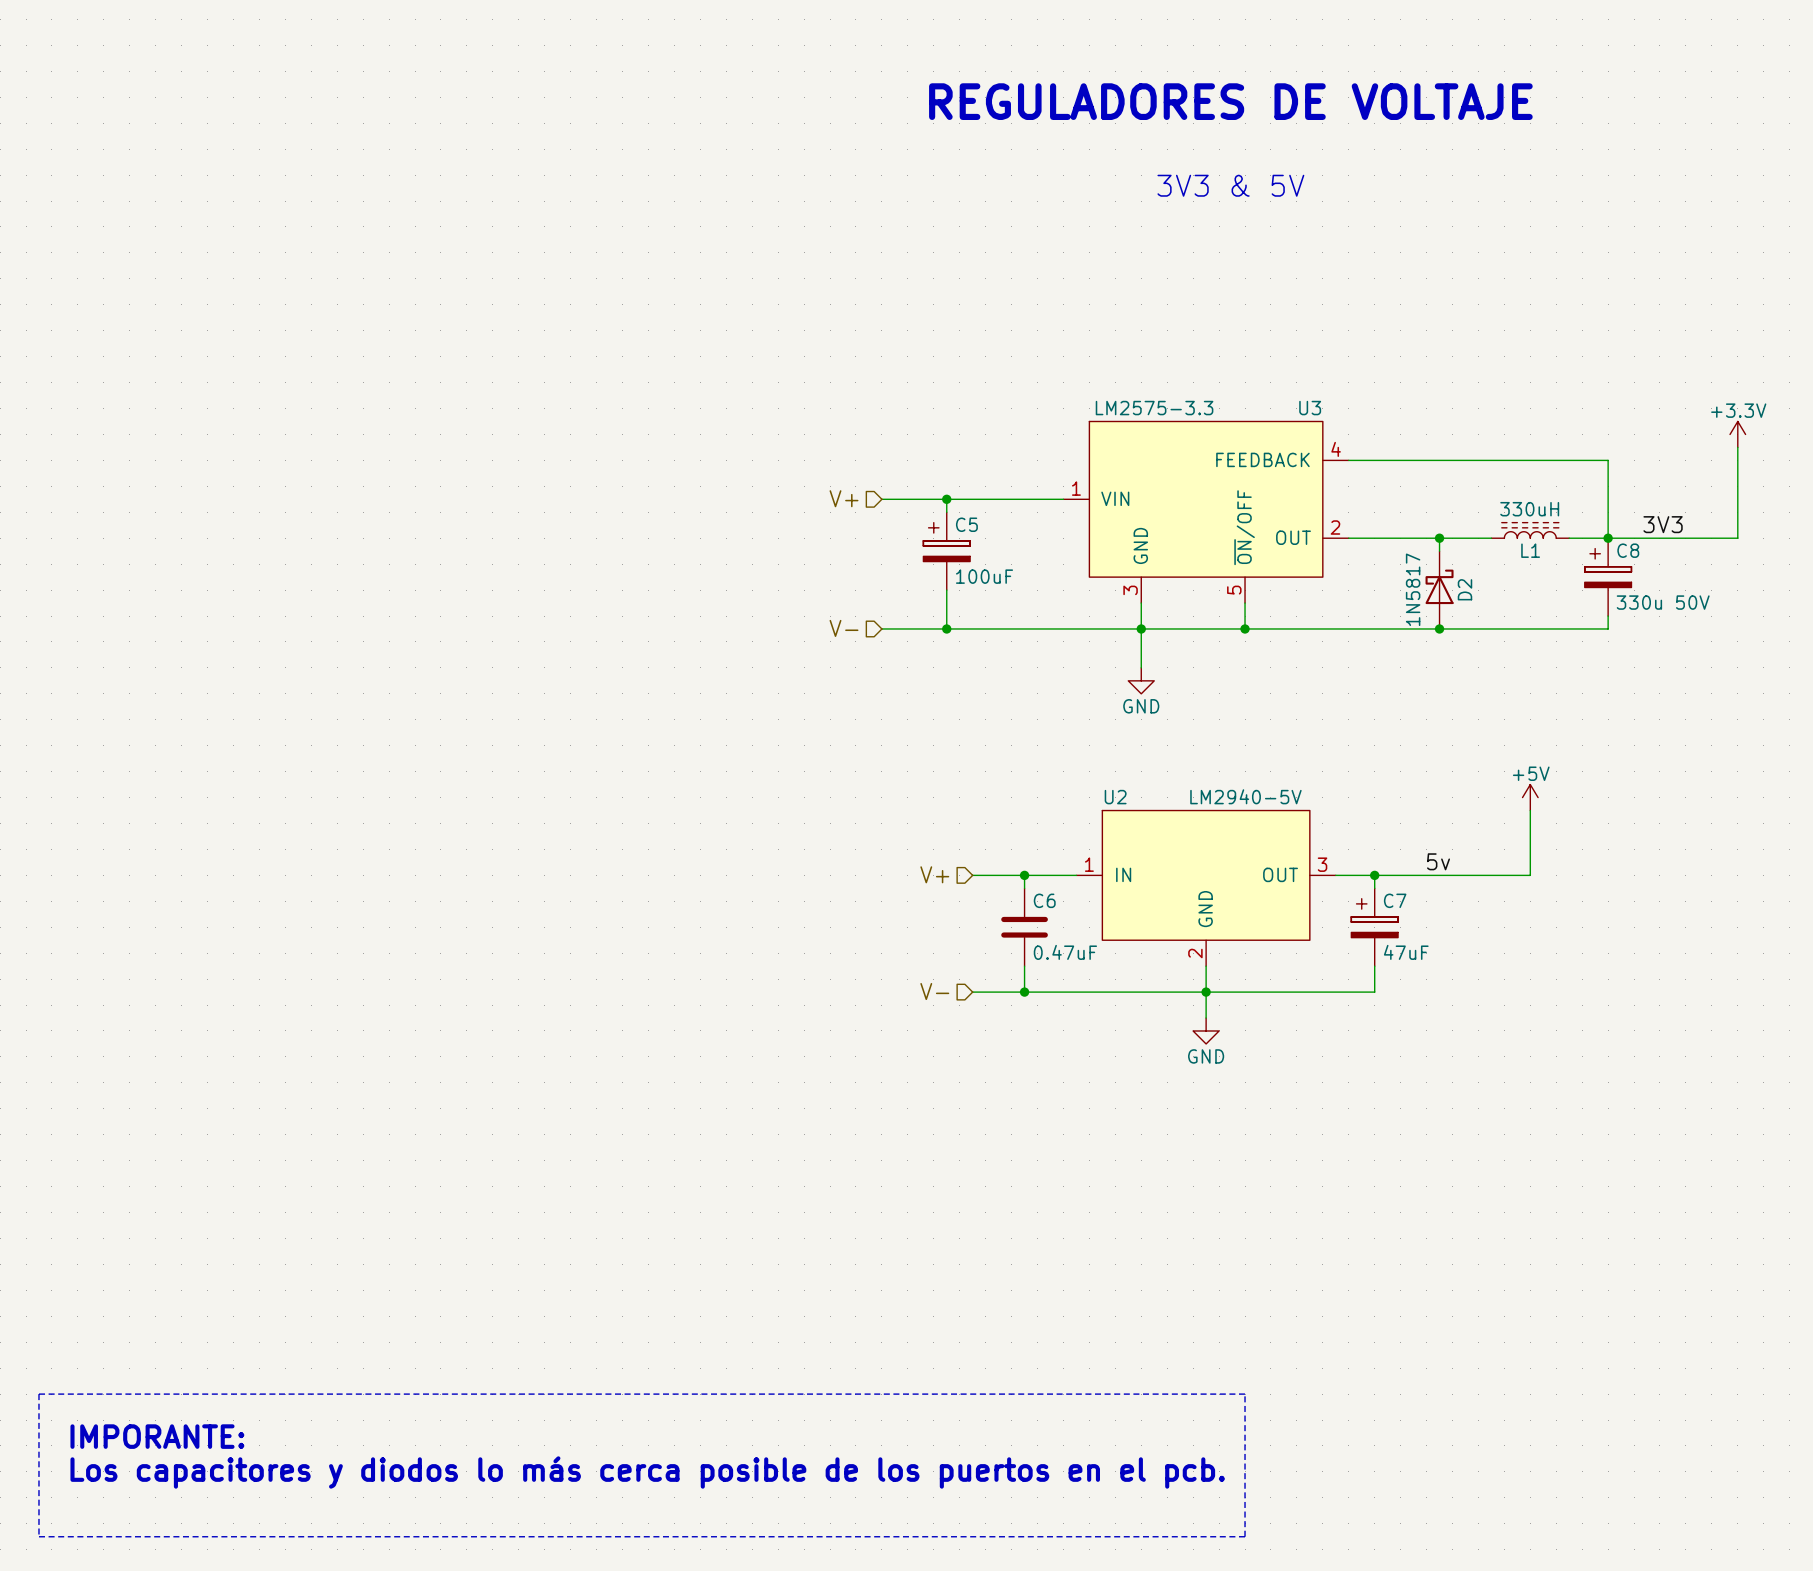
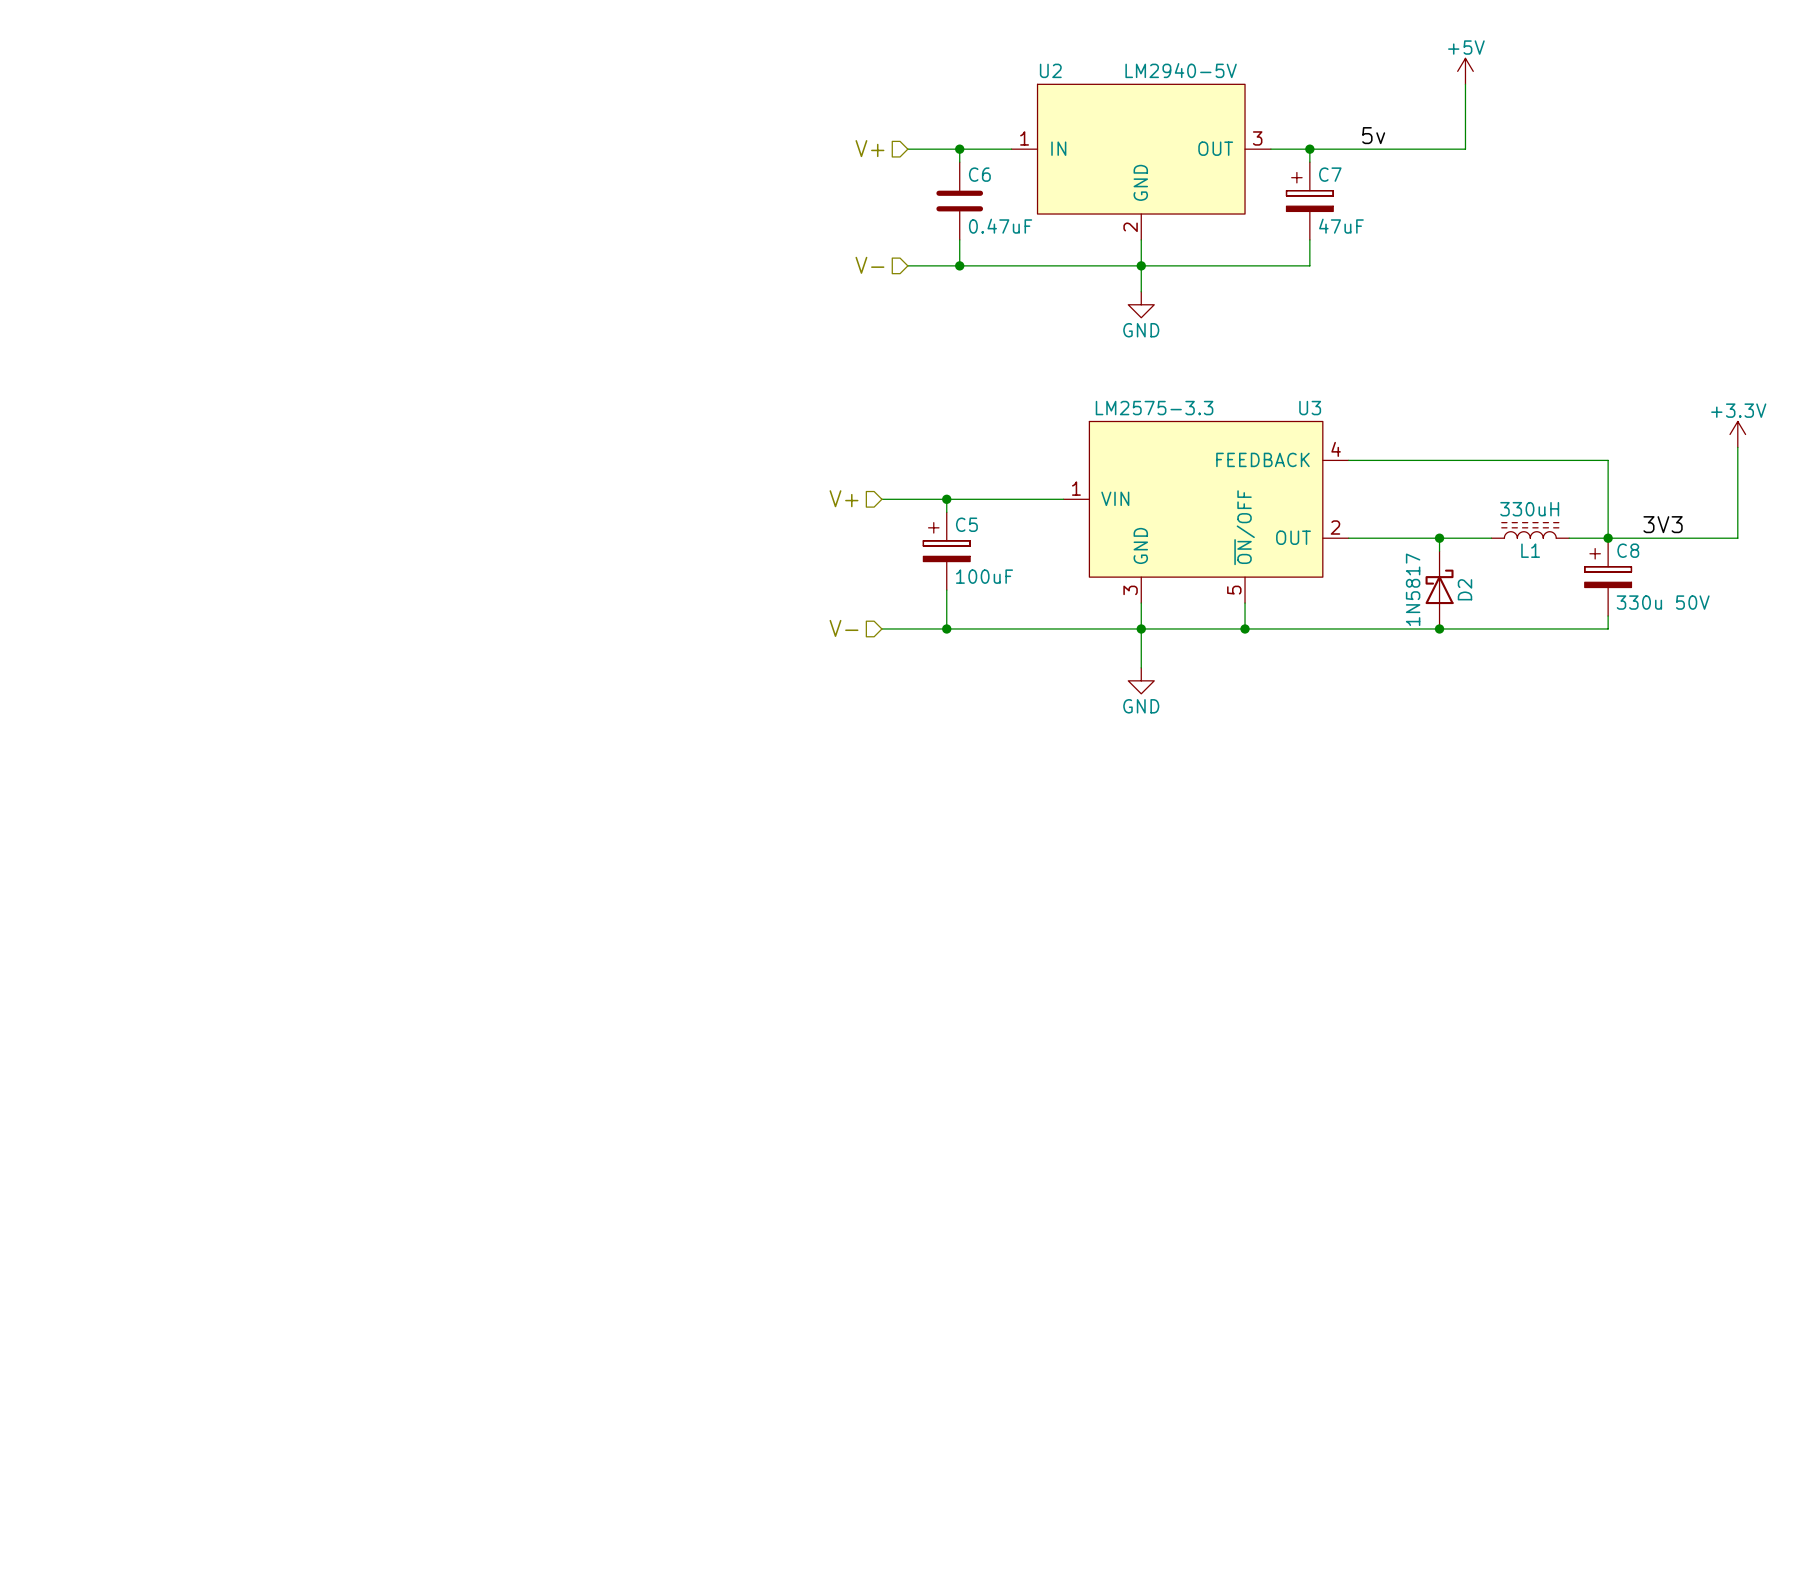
power symbol: none -> +5V (1465, 71)
wire: none -> (1465, 84) (1465, 149) (1270, 149)
text: REGULADORES DE VOLTAJE (1230, 101) -> none
label: none -> 5v (1373, 135)
hierarchical label: none -> V+ (869, 148)
wire: none -> (907, 149) (1011, 149)
wire: none -> (959, 149) (959, 162)
junction: none -> (959, 149)
wire: none -> (1309, 149) (1309, 162)
junction: none -> (1309, 149)
text: 3V3 & 5V (1230, 185) -> none
wire: none -> (959, 239) (959, 265)
wire: none -> (1141, 239) (1141, 291)
wire: none -> (1309, 239) (1309, 265) (907, 265)
hierarchical label: none -> V- (869, 265)
junction: none -> (959, 265)
junction: none -> (1141, 265)
power symbol: none -> GND (1141, 304)
power symbol: +5V (1530, 797) -> none
wire: (1530, 810) (1530, 875) (1335, 875) -> none
label: 5v (1438, 861) -> none
hierarchical label: V+ (934, 874) -> none
wire: (972, 875) (1076, 875) -> none
wire: (1024, 875) (1024, 888) -> none
junction: (1024, 875) -> none
wire: (1374, 875) (1374, 888) -> none
junction: (1374, 875) -> none
U2 position: (1206, 888) -> (1141, 162)
C6 position: (1024, 927) -> (959, 201)
C7 position: (1374, 927) -> (1309, 201)
wire: (1024, 966) (1024, 992) -> none
wire: (1206, 966) (1206, 1018) -> none
wire: (1374, 966) (1374, 992) (972, 992) -> none
hierarchical label: V- (934, 991) -> none
junction: (1024, 992) -> none
junction: (1206, 992) -> none
power symbol: GND (1206, 1030) -> none
line: (38, 1394) (38, 1536) (1245, 1536) (1245, 1394) (38, 1394) -> none
text: IMPORANTE: (157, 1436) -> none
text: Los capacitores y diodos lo más cerca posible de los puertos en el pcb. (647, 1472) -> none

